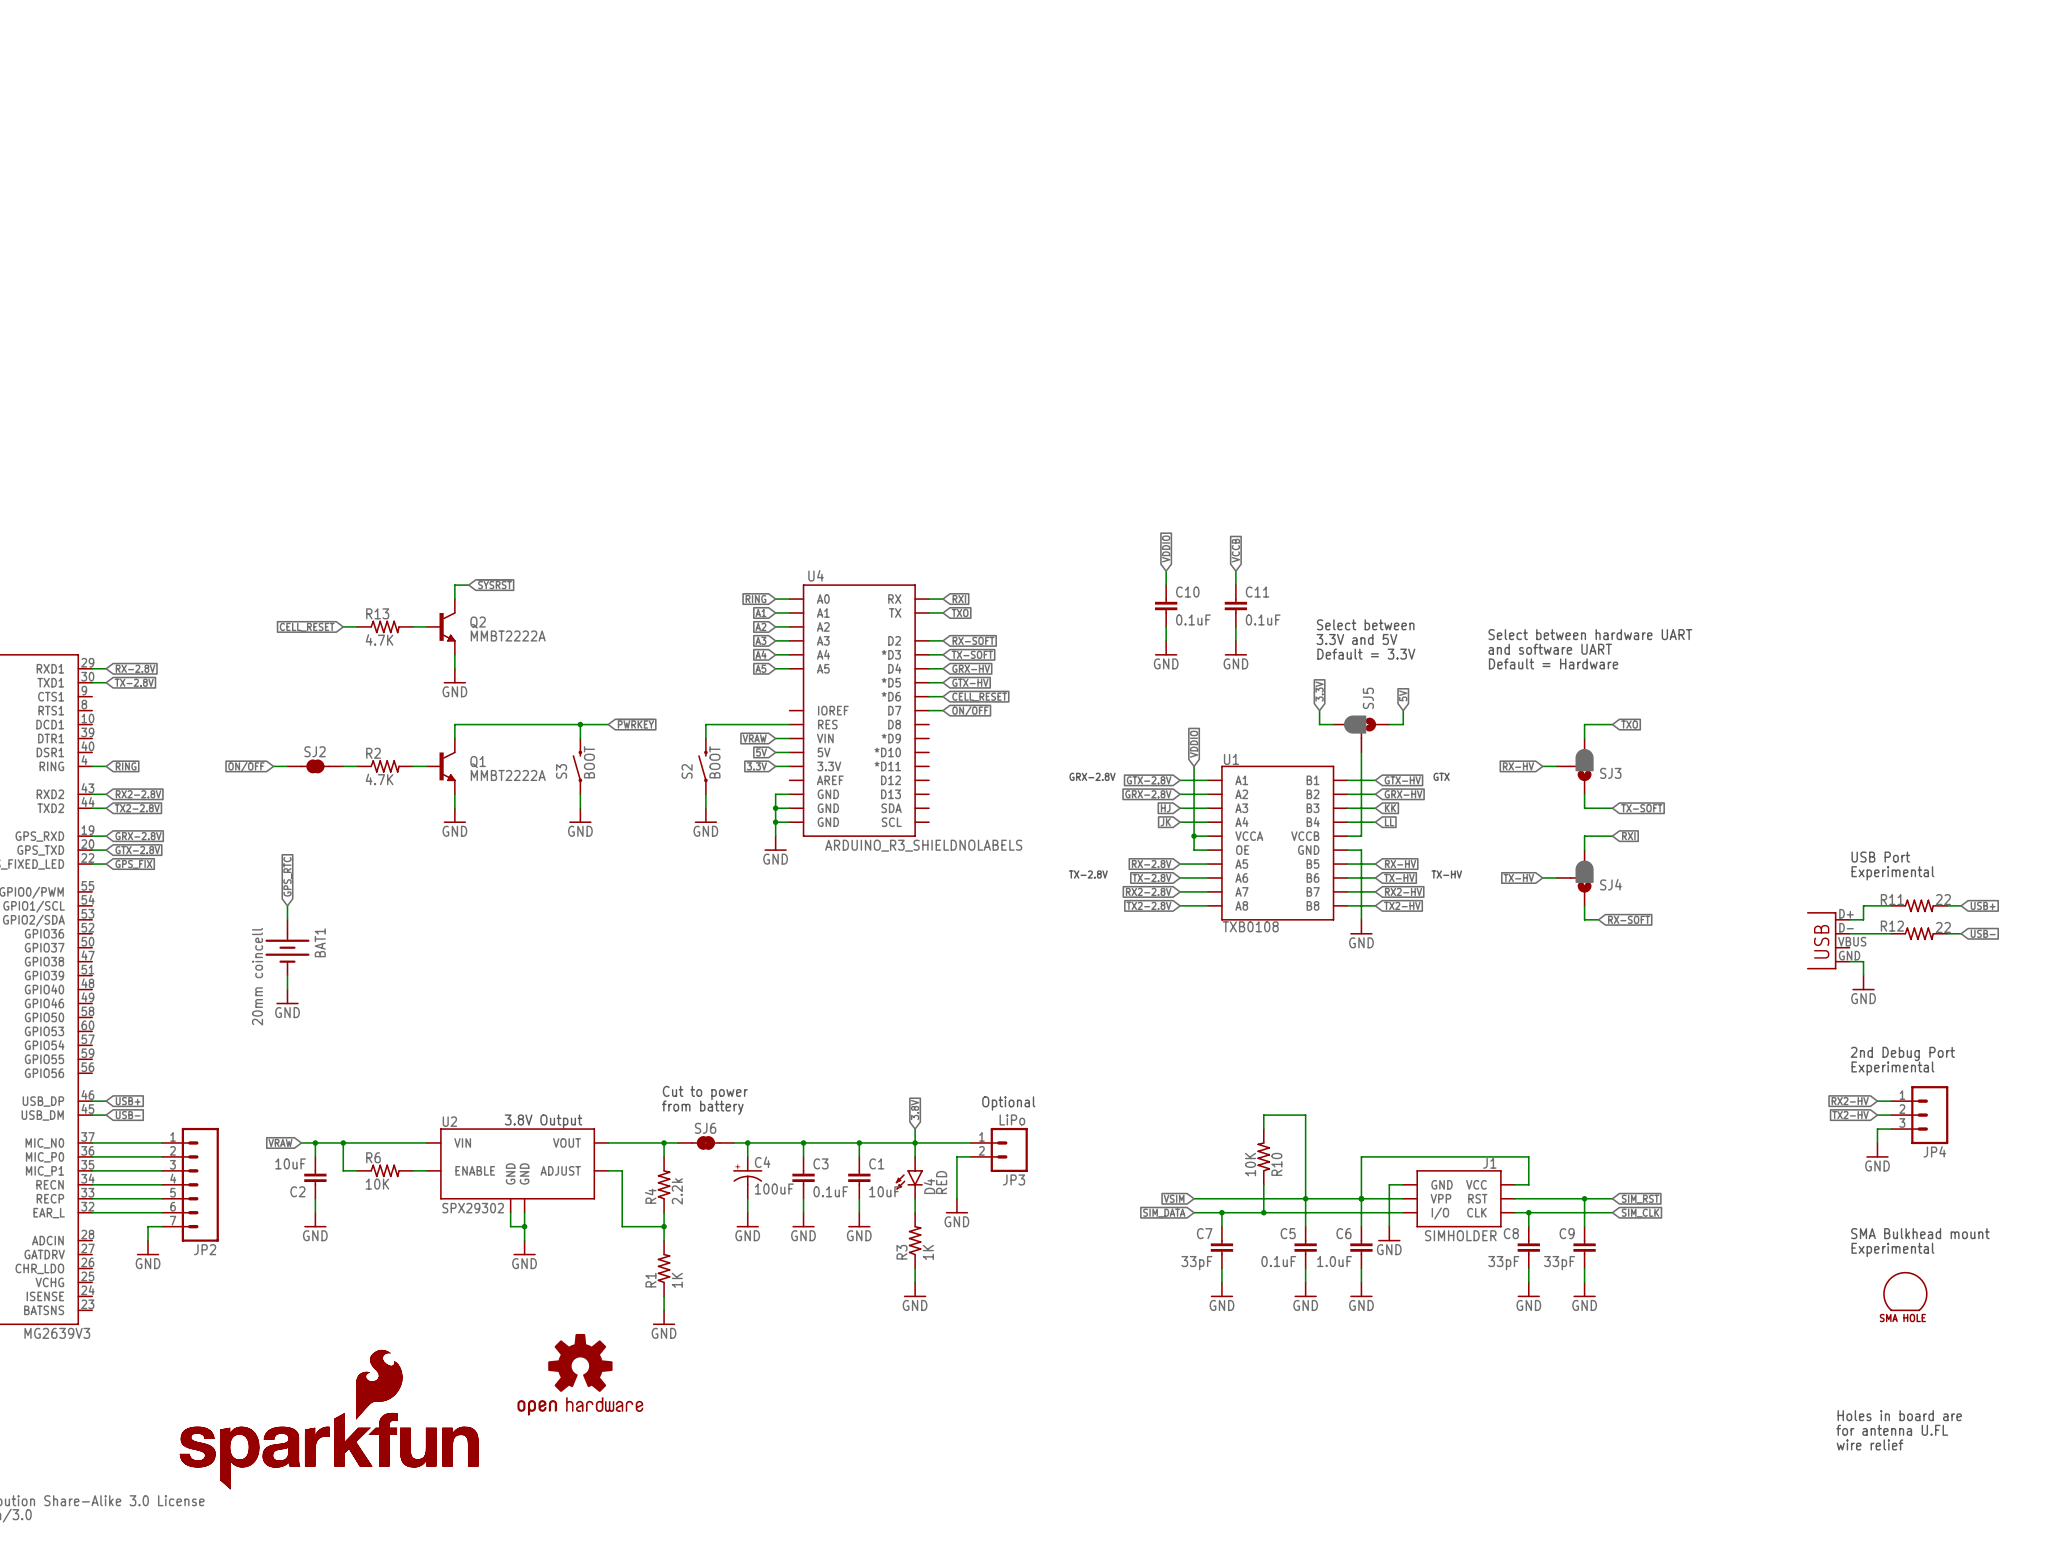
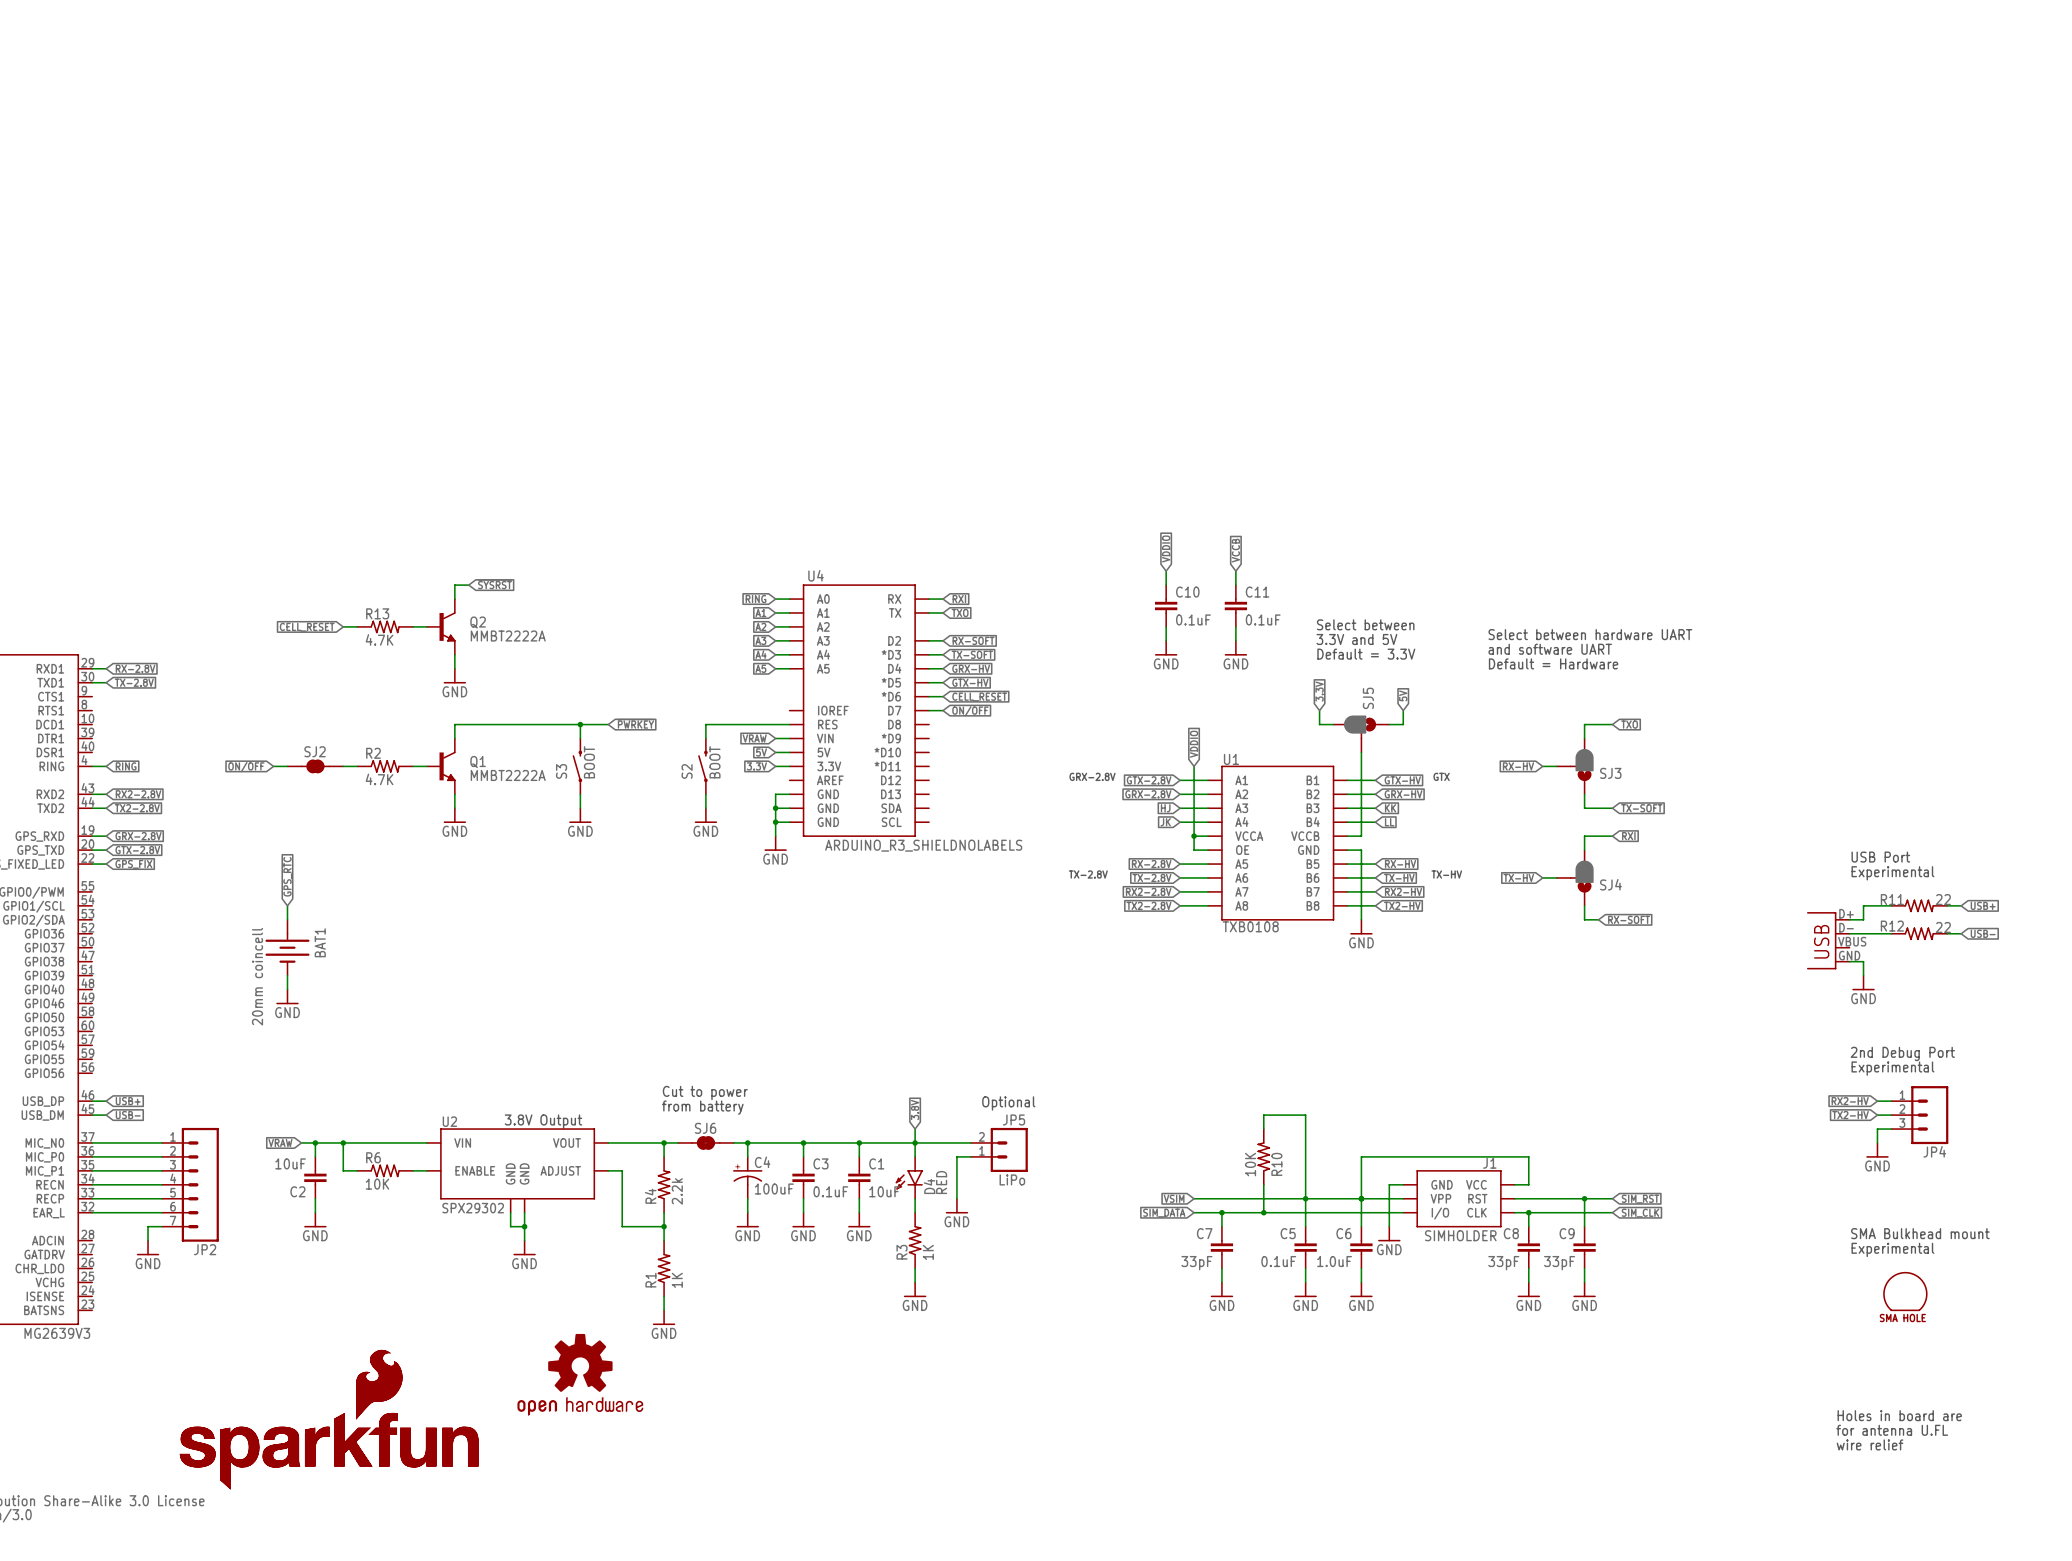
JP3 flip: as is (1009, 1149) -> up-down (1009, 1149)
JP3 name: JP3 (1014, 1179) -> JP5 (1014, 1119)

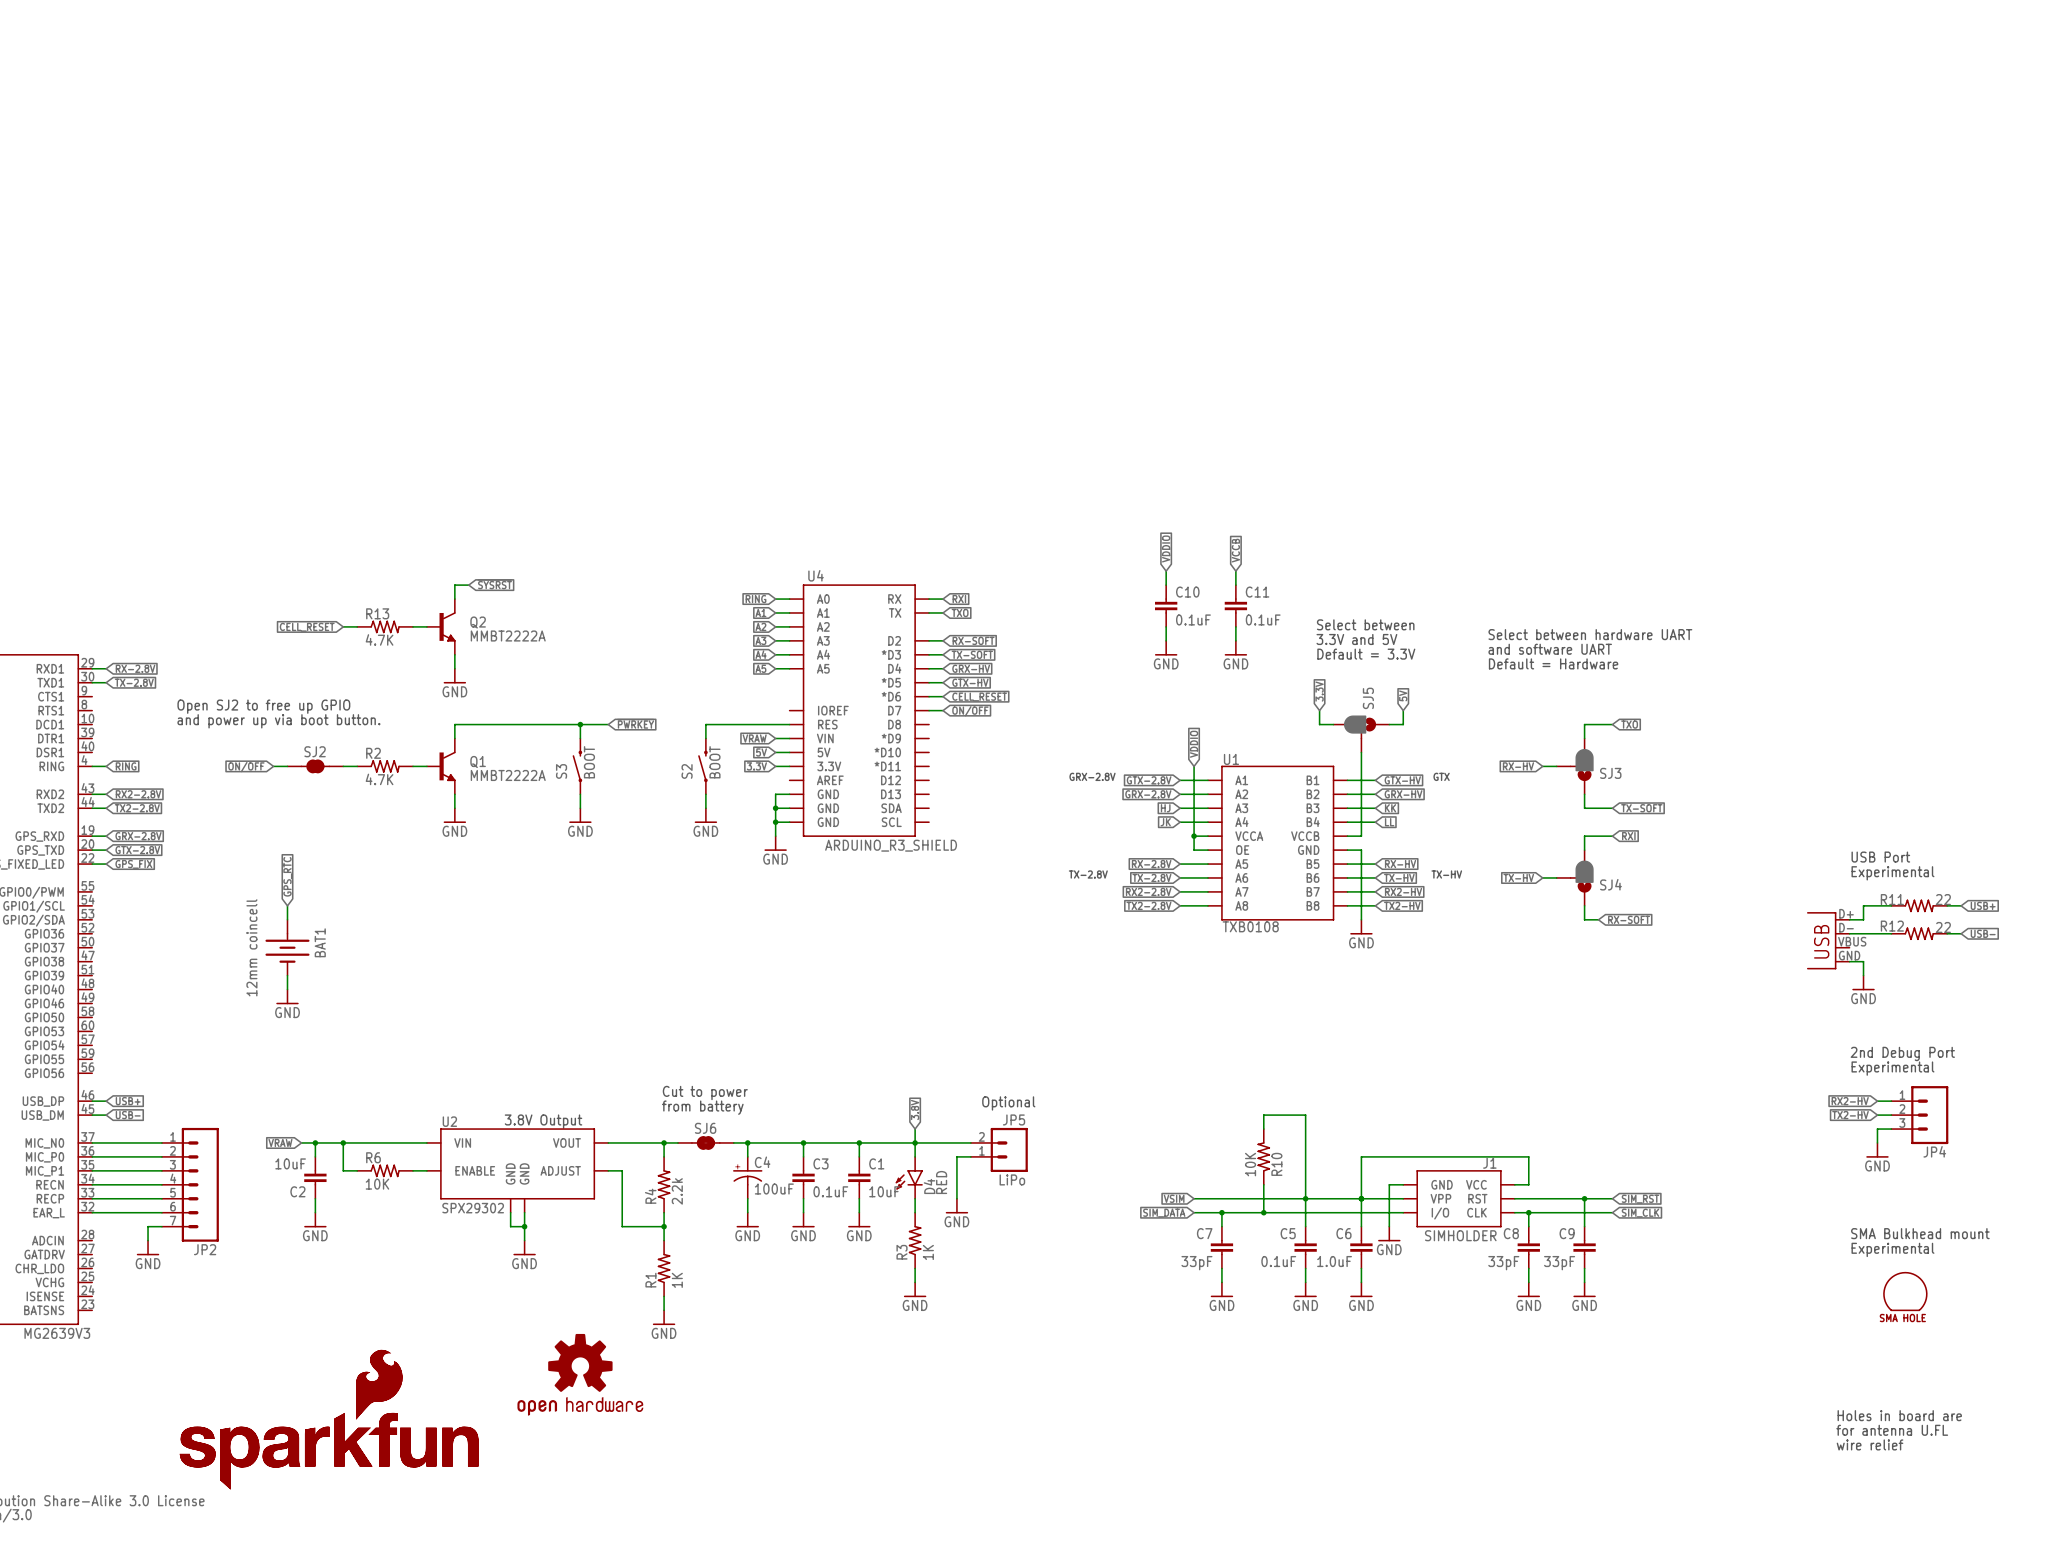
text: none -> Open SJ2 to free up GPIO (263, 706)
text: none -> and power up via boot button. (278, 721)
U4 value: ARDUINO_R3_SHIELDNOLABELS (923, 845) -> ARDUINO_R3_SHIELD (891, 845)
BAT1 value: 20mm coincell (257, 976) -> 12mm coincell (251, 947)

